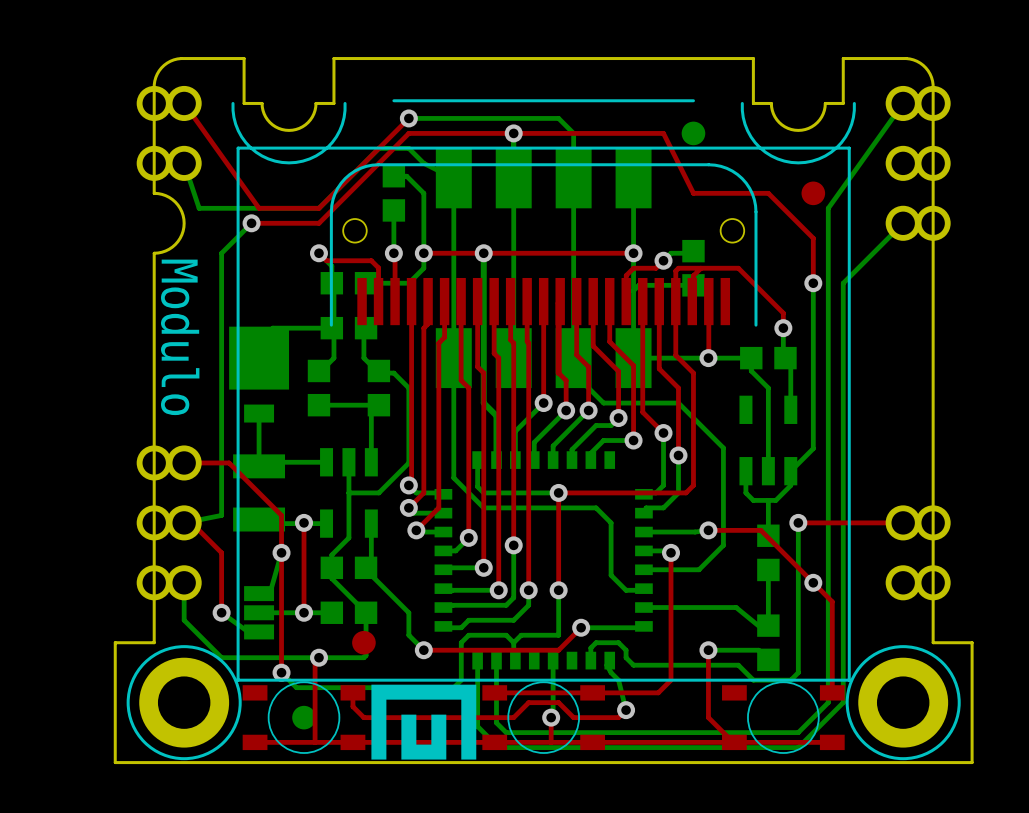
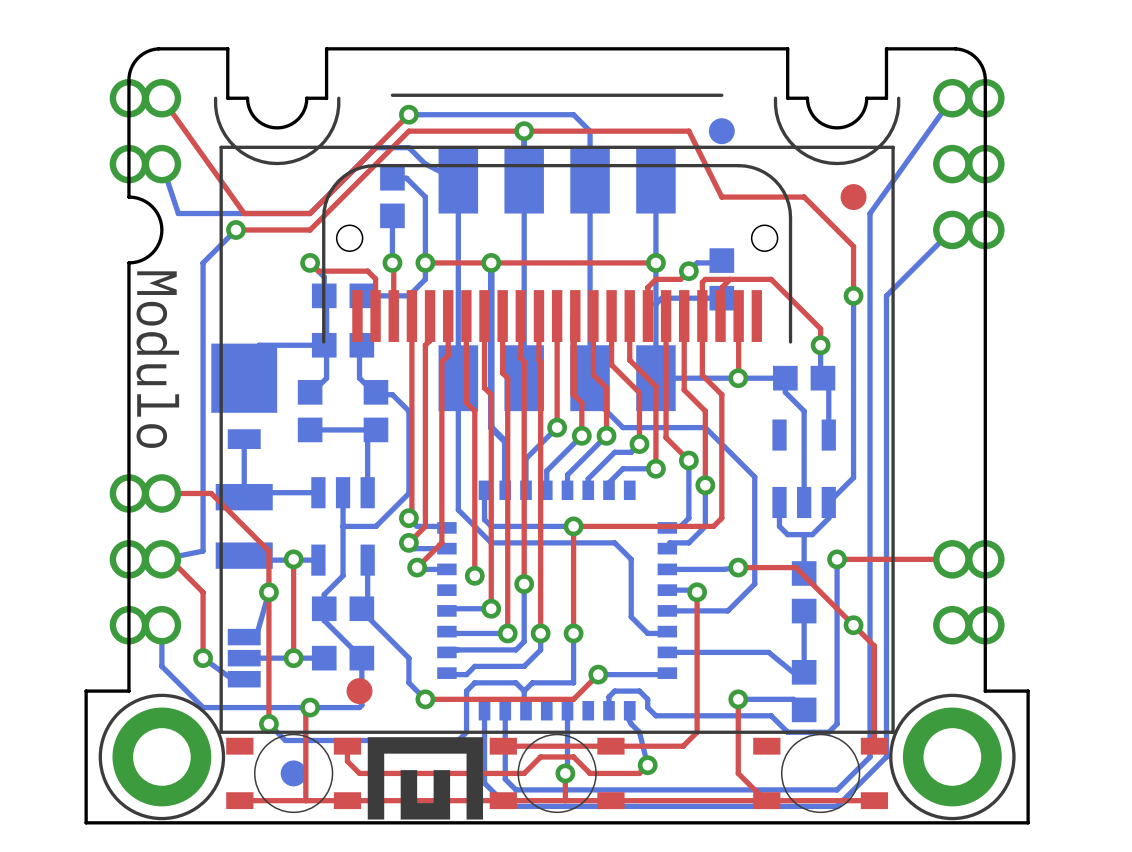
bottom track: (468, 537) (455, 550) (443, 550) -> none

